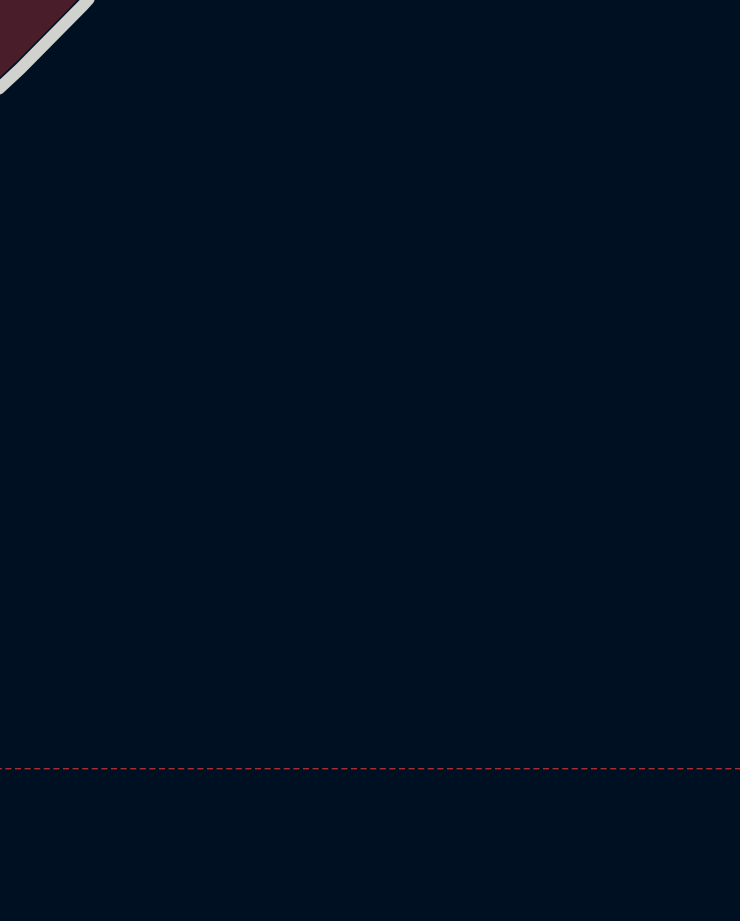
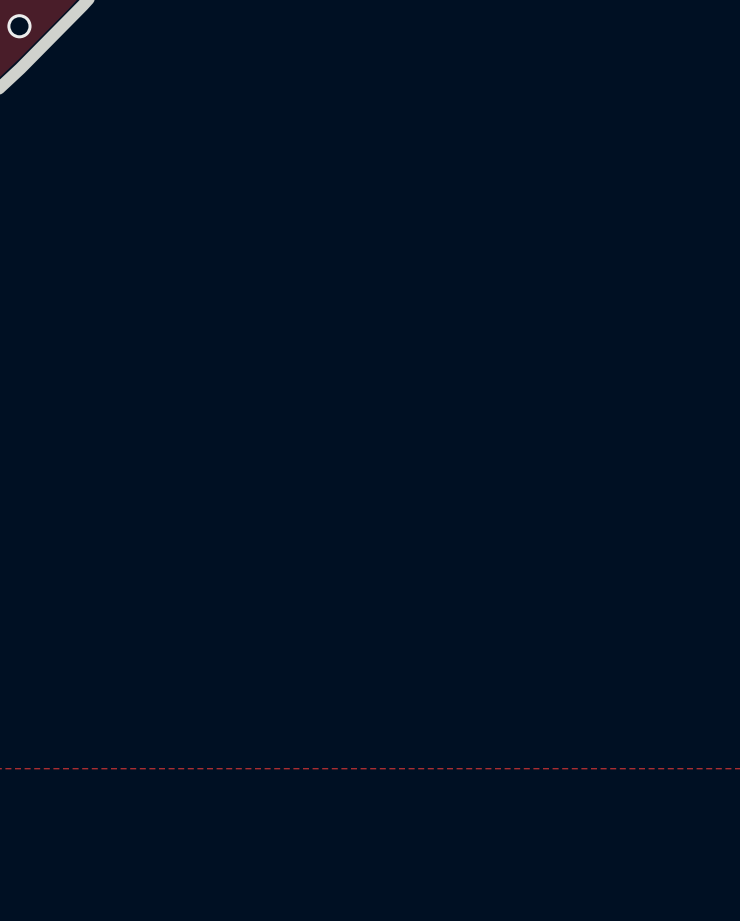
via: none -> (19, 26)

